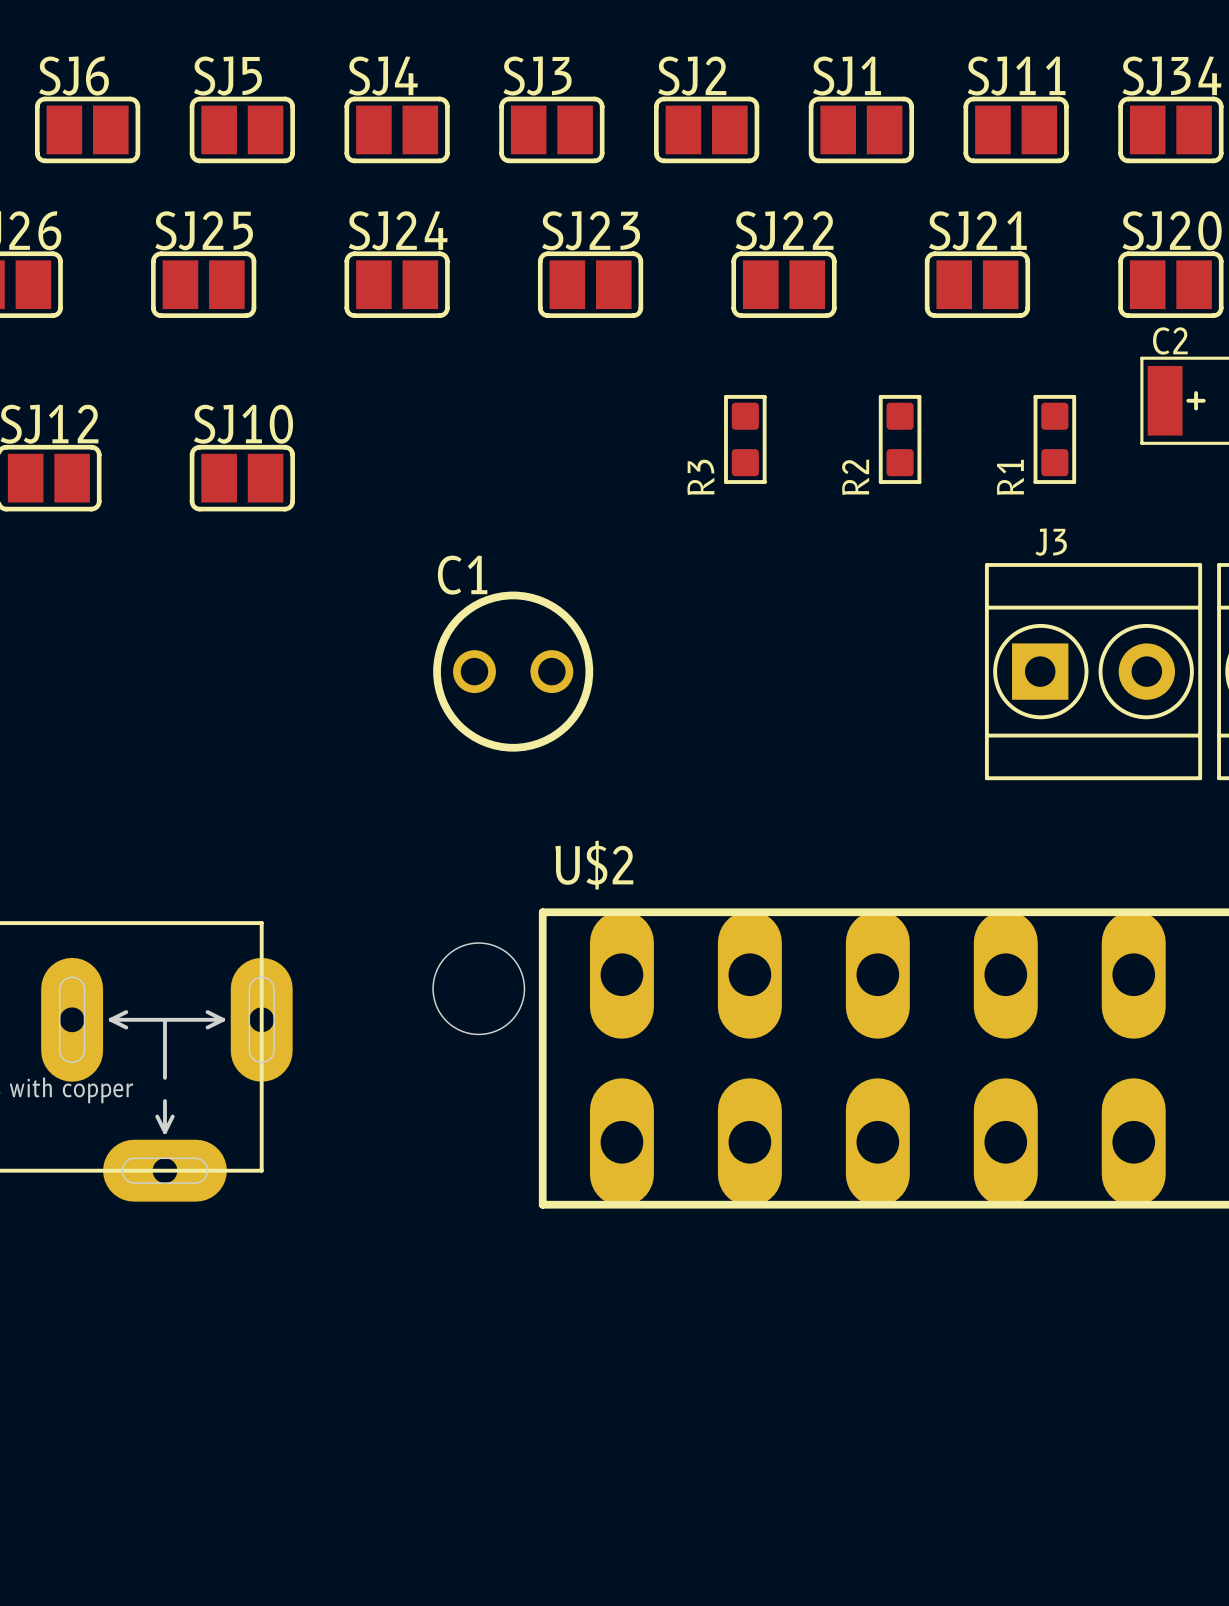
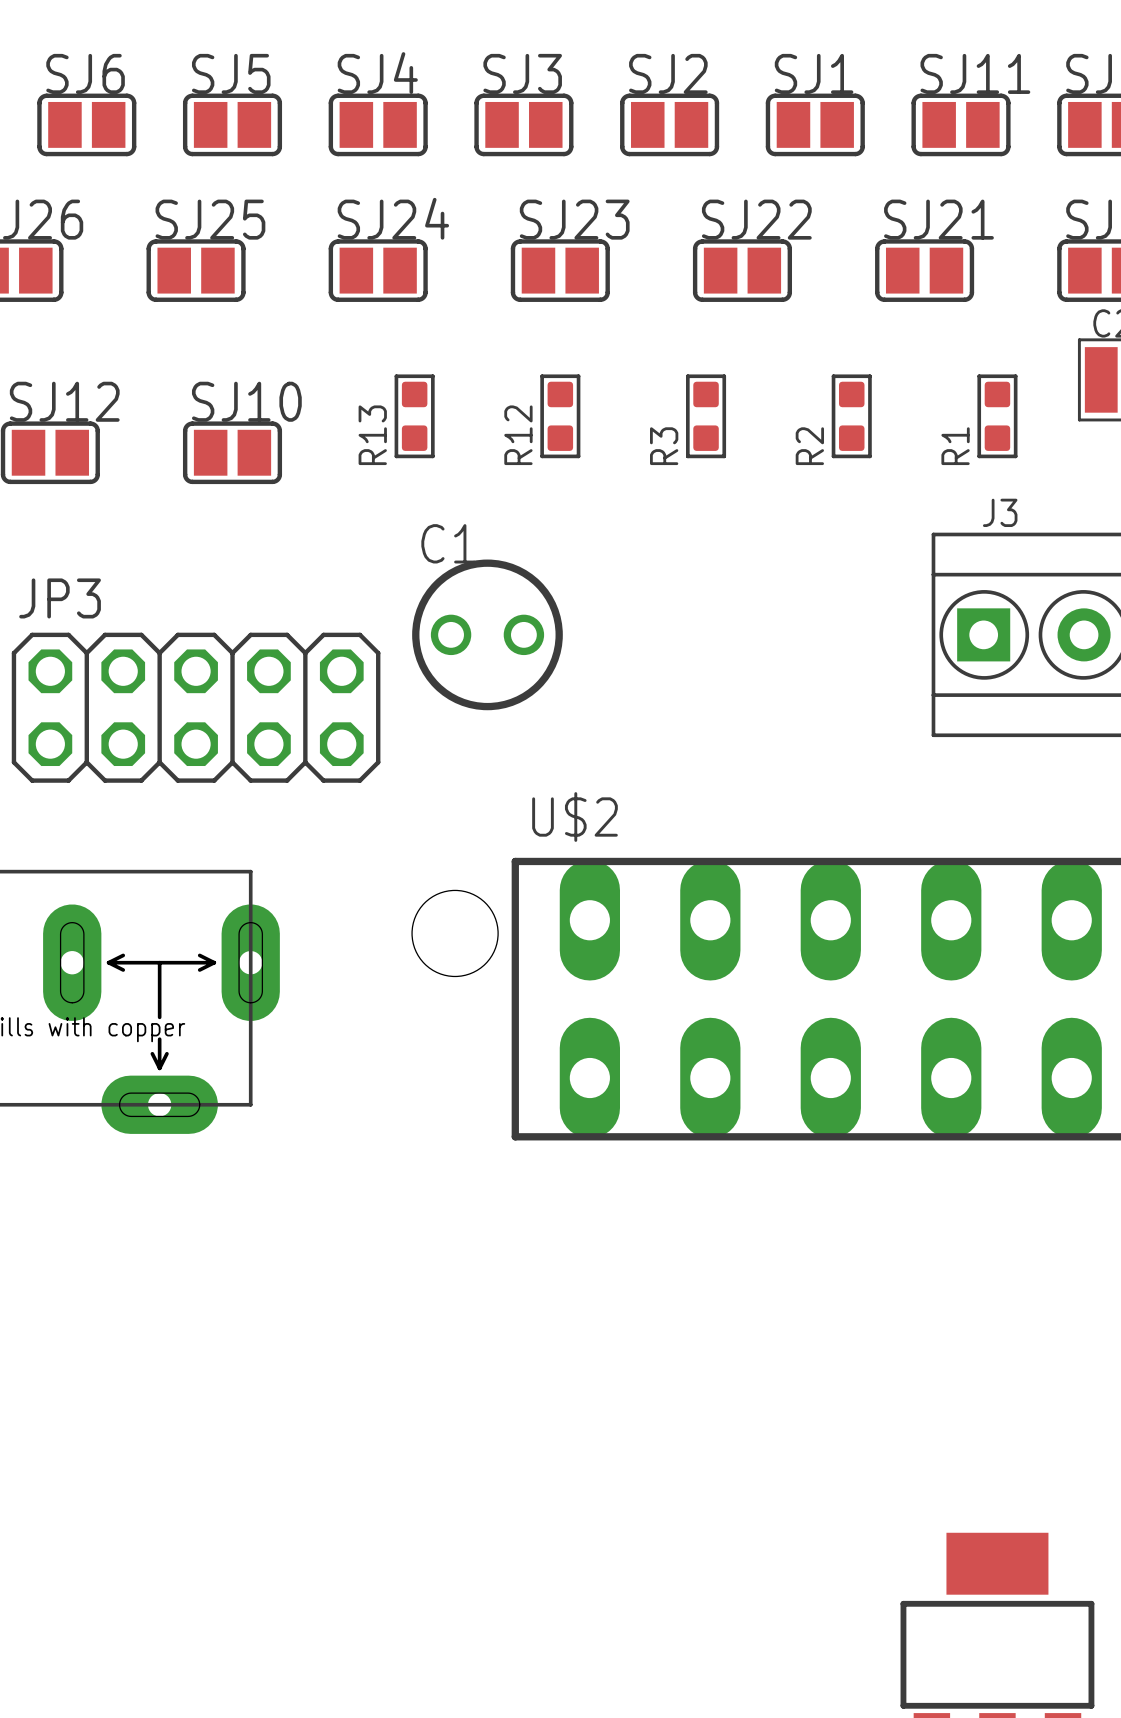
R13: none -> (414, 416)
R12: none -> (560, 416)
JP3: none -> (196, 707)

